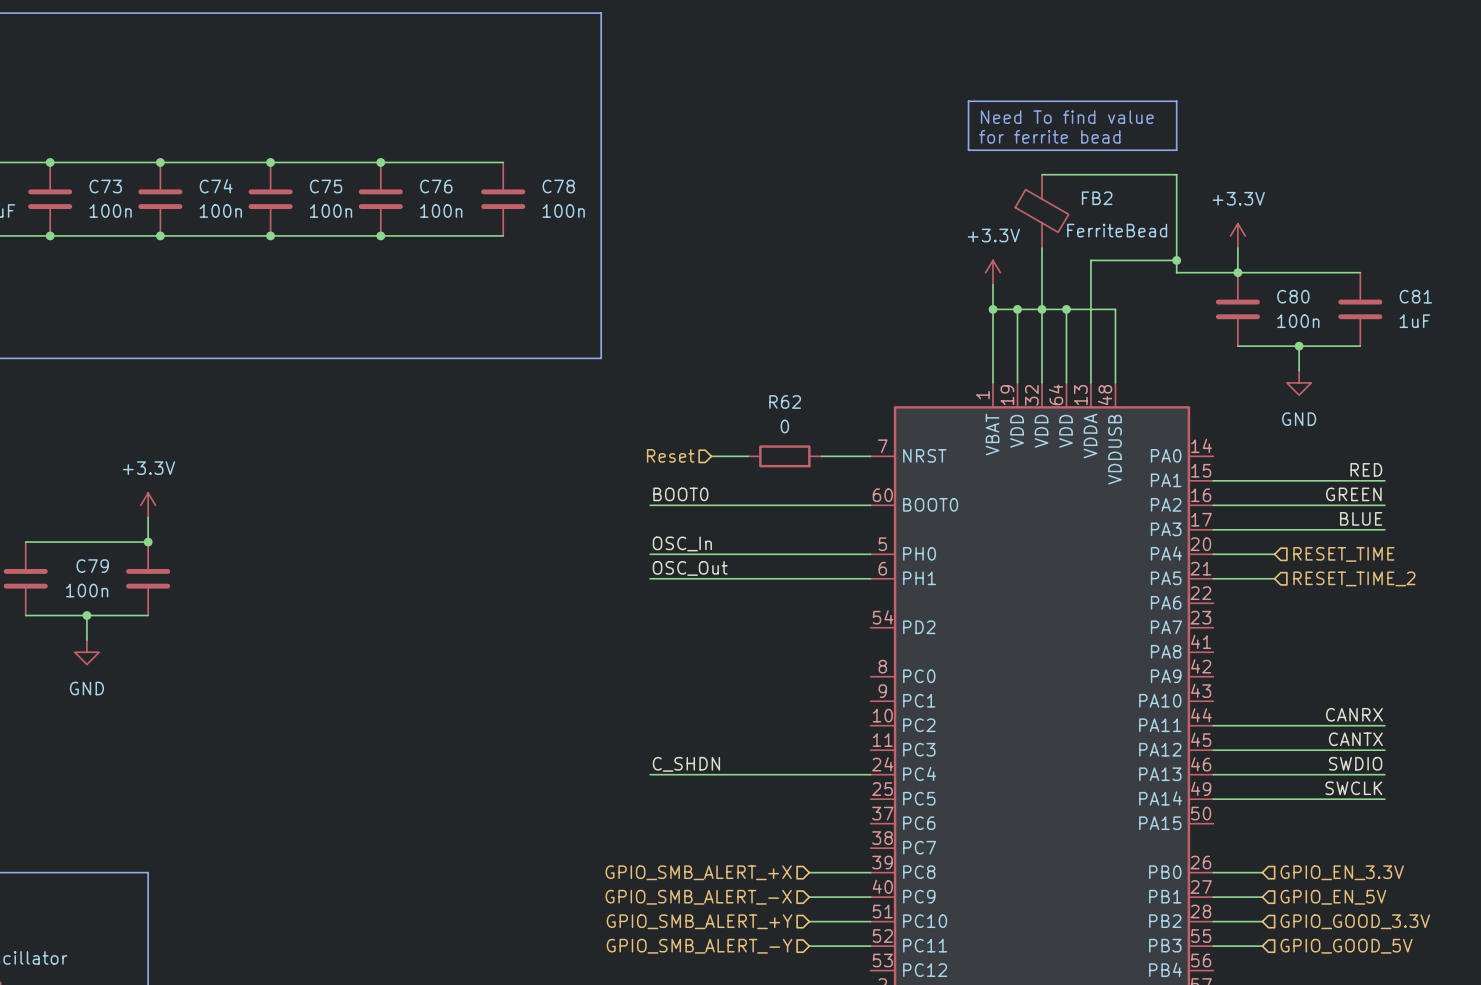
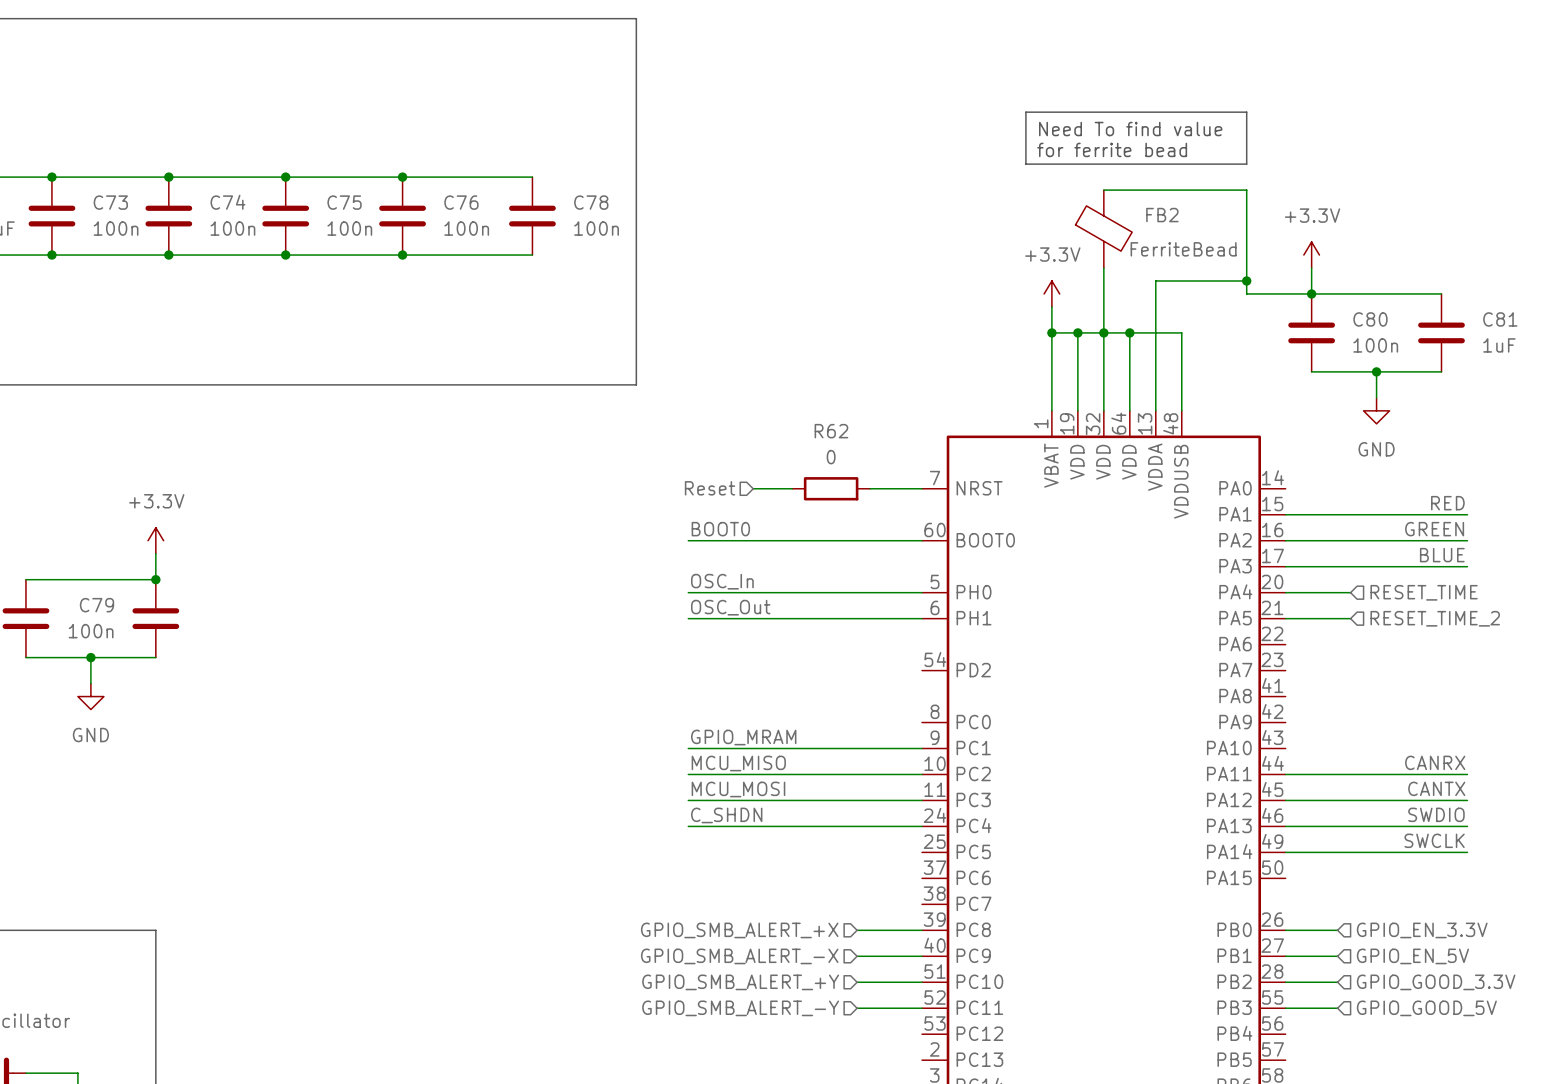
label: none -> GPIO_MRAM (743, 737)
wire: none -> (688, 748) (922, 748)
label: none -> MCU_MISO (738, 763)
wire: none -> (688, 774) (922, 774)
label: none -> MCU_MOSI (738, 789)
wire: none -> (688, 800) (922, 800)

